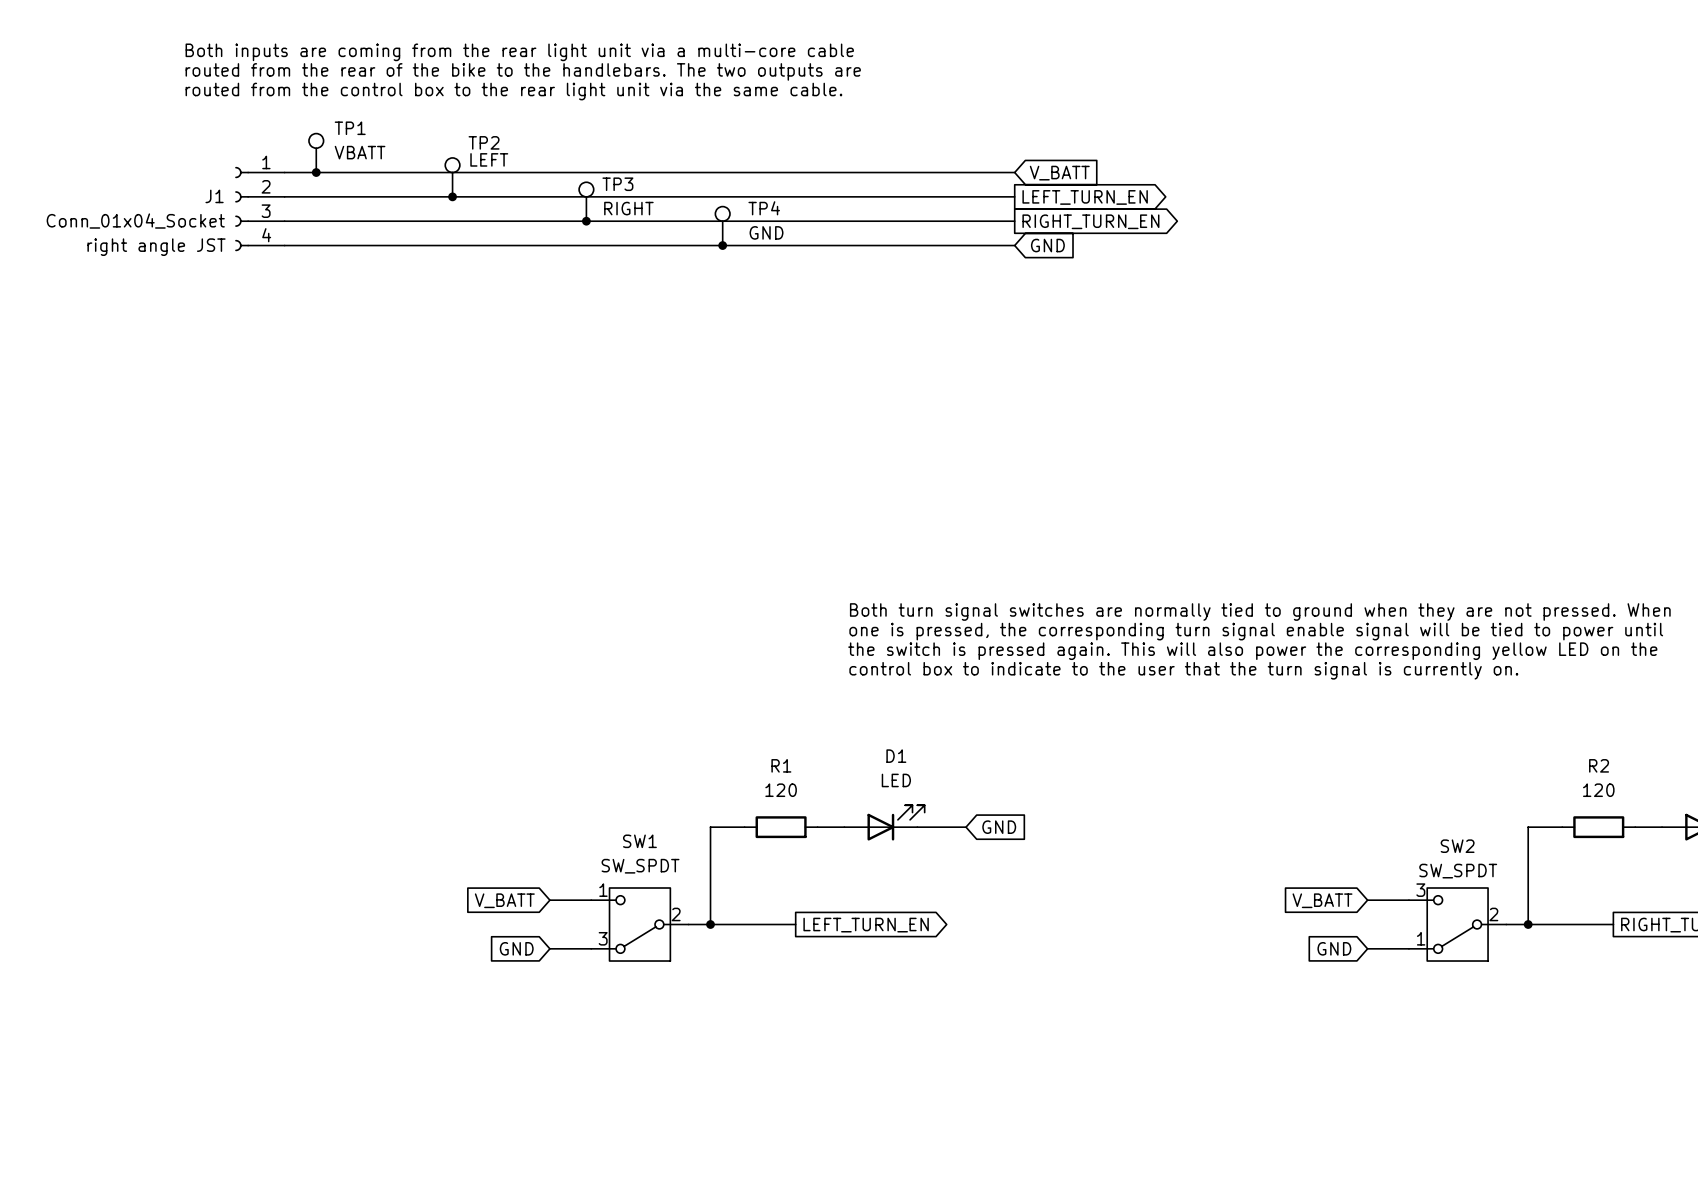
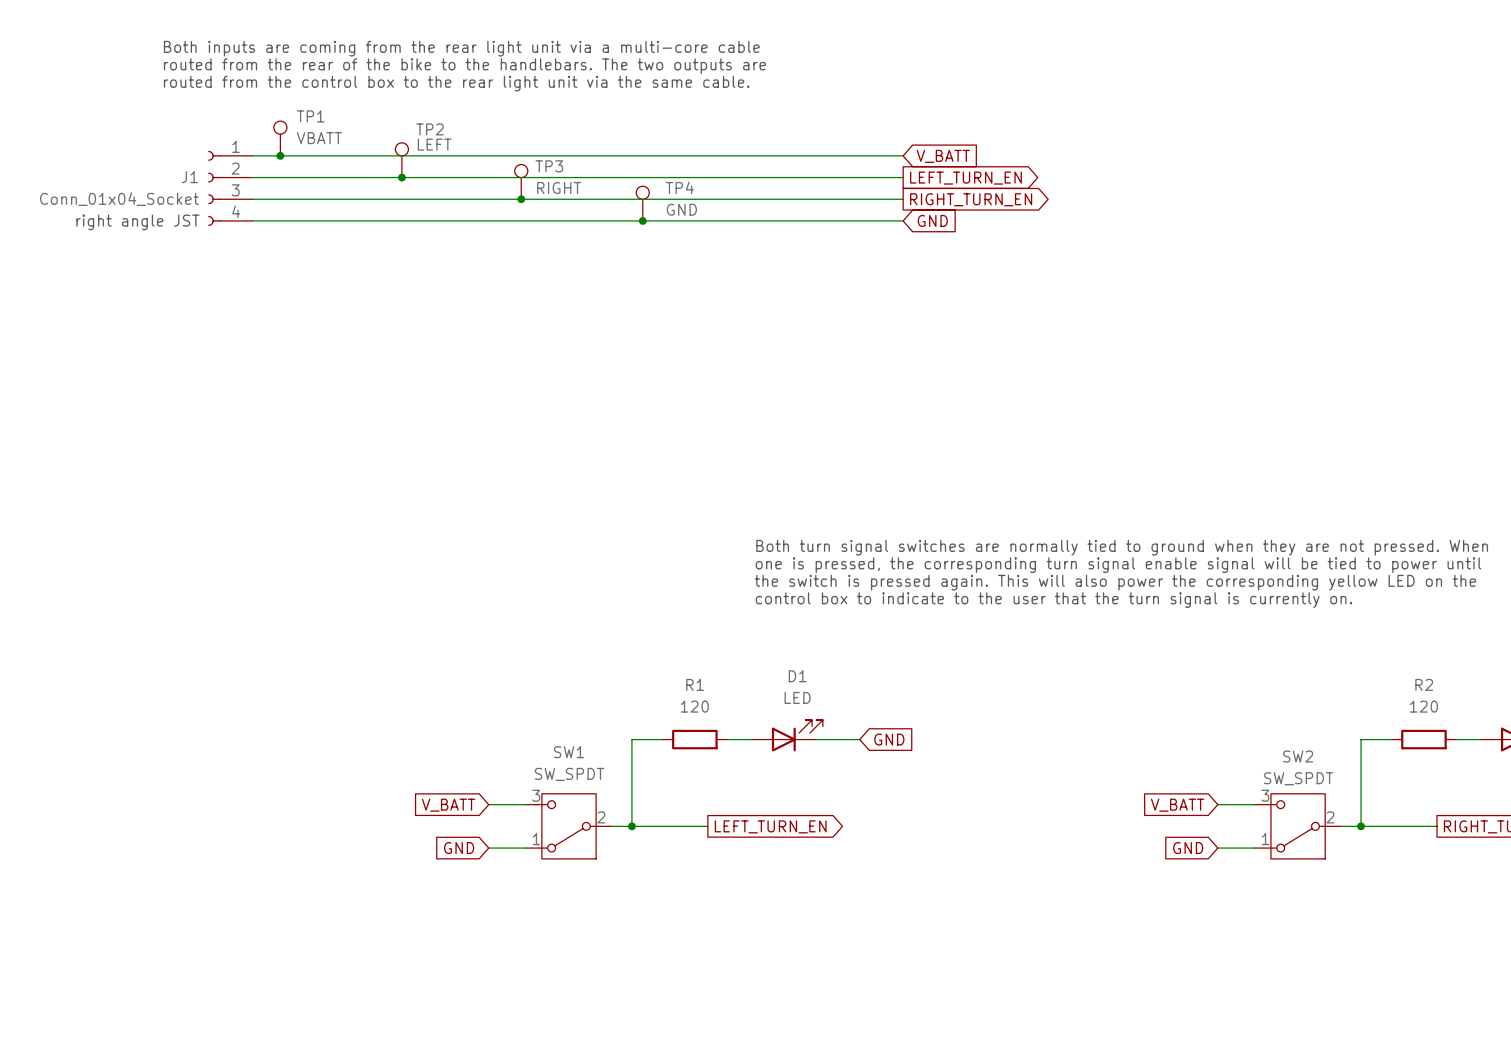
SW1 pin number: 1 (603, 890) -> 3 (536, 795)
SW1 pin number: 3 (603, 938) -> 1 (536, 839)

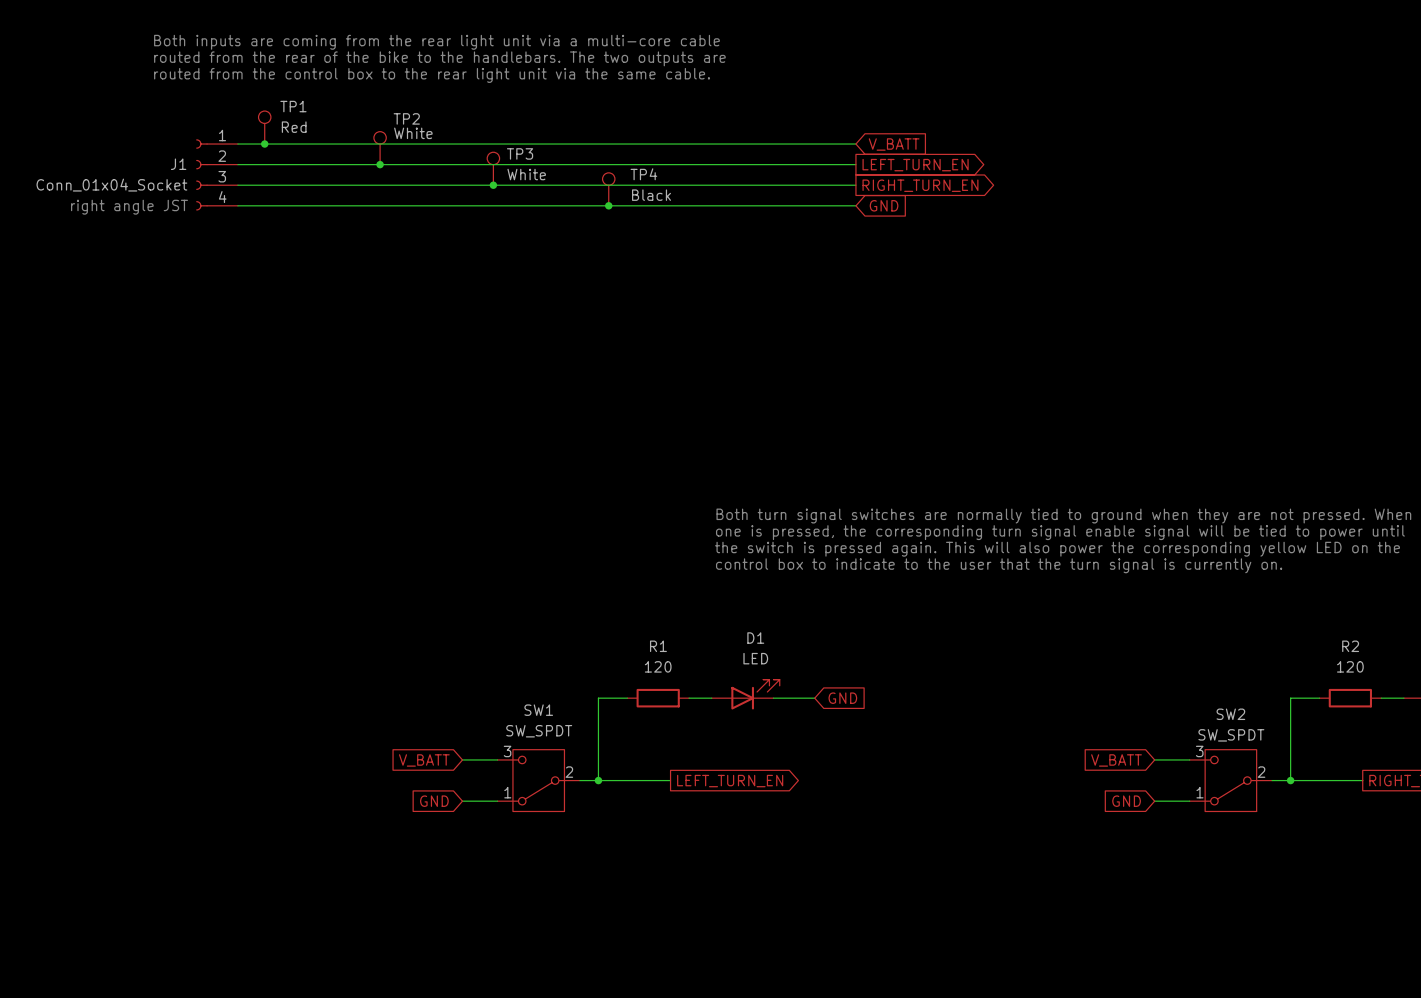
TP1 value: VBATT (319, 138) -> Red (294, 127)
TP2 value: LEFT (434, 144) -> White (413, 133)
TP3 value: RIGHT (559, 188) -> White (526, 174)
TP4 value: GND (681, 209) -> Black (651, 195)

